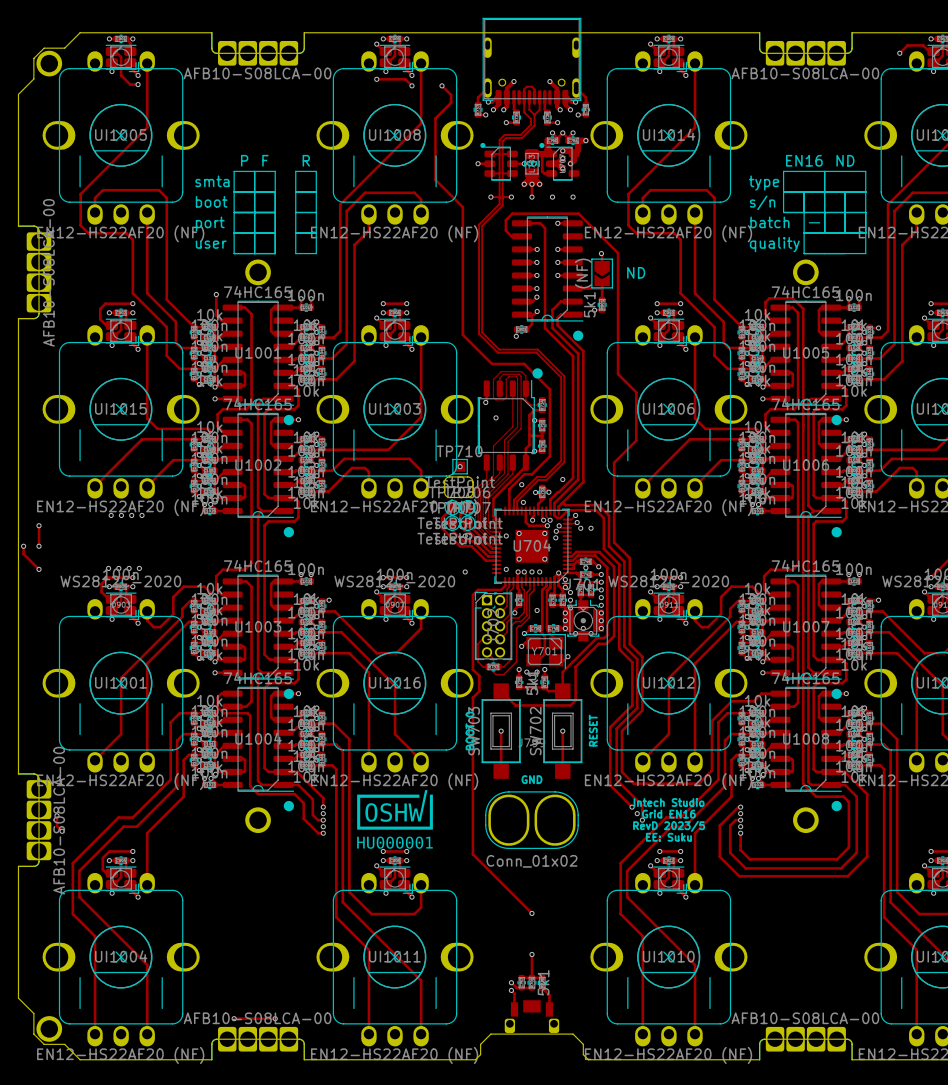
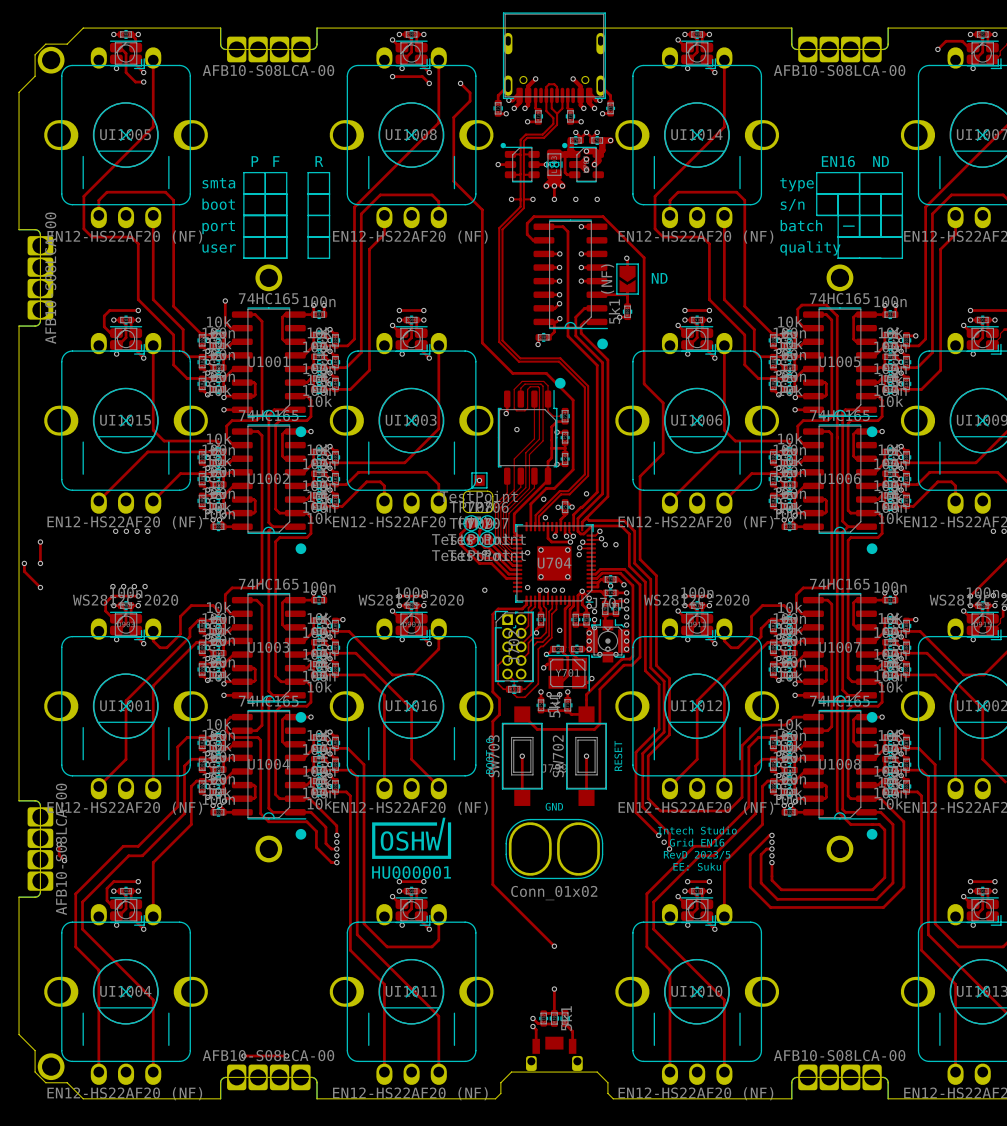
TP710 name: TP710 (459, 451) -> none

